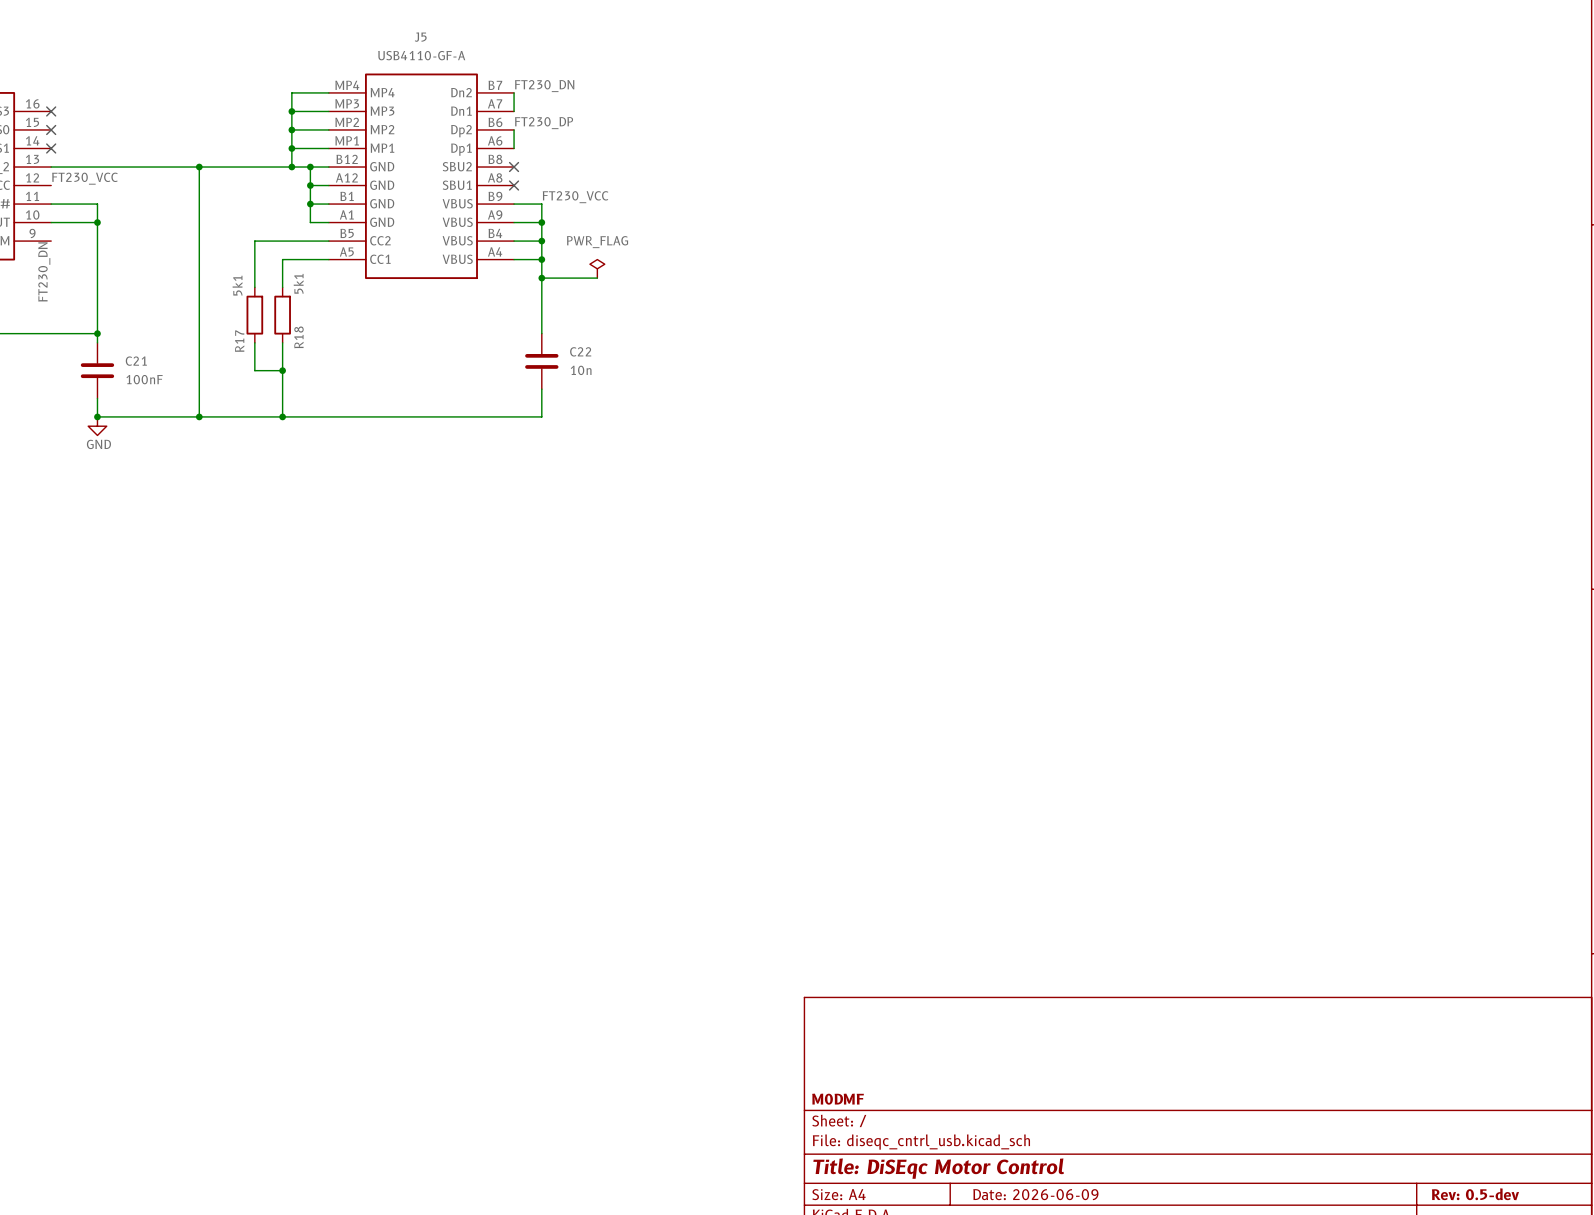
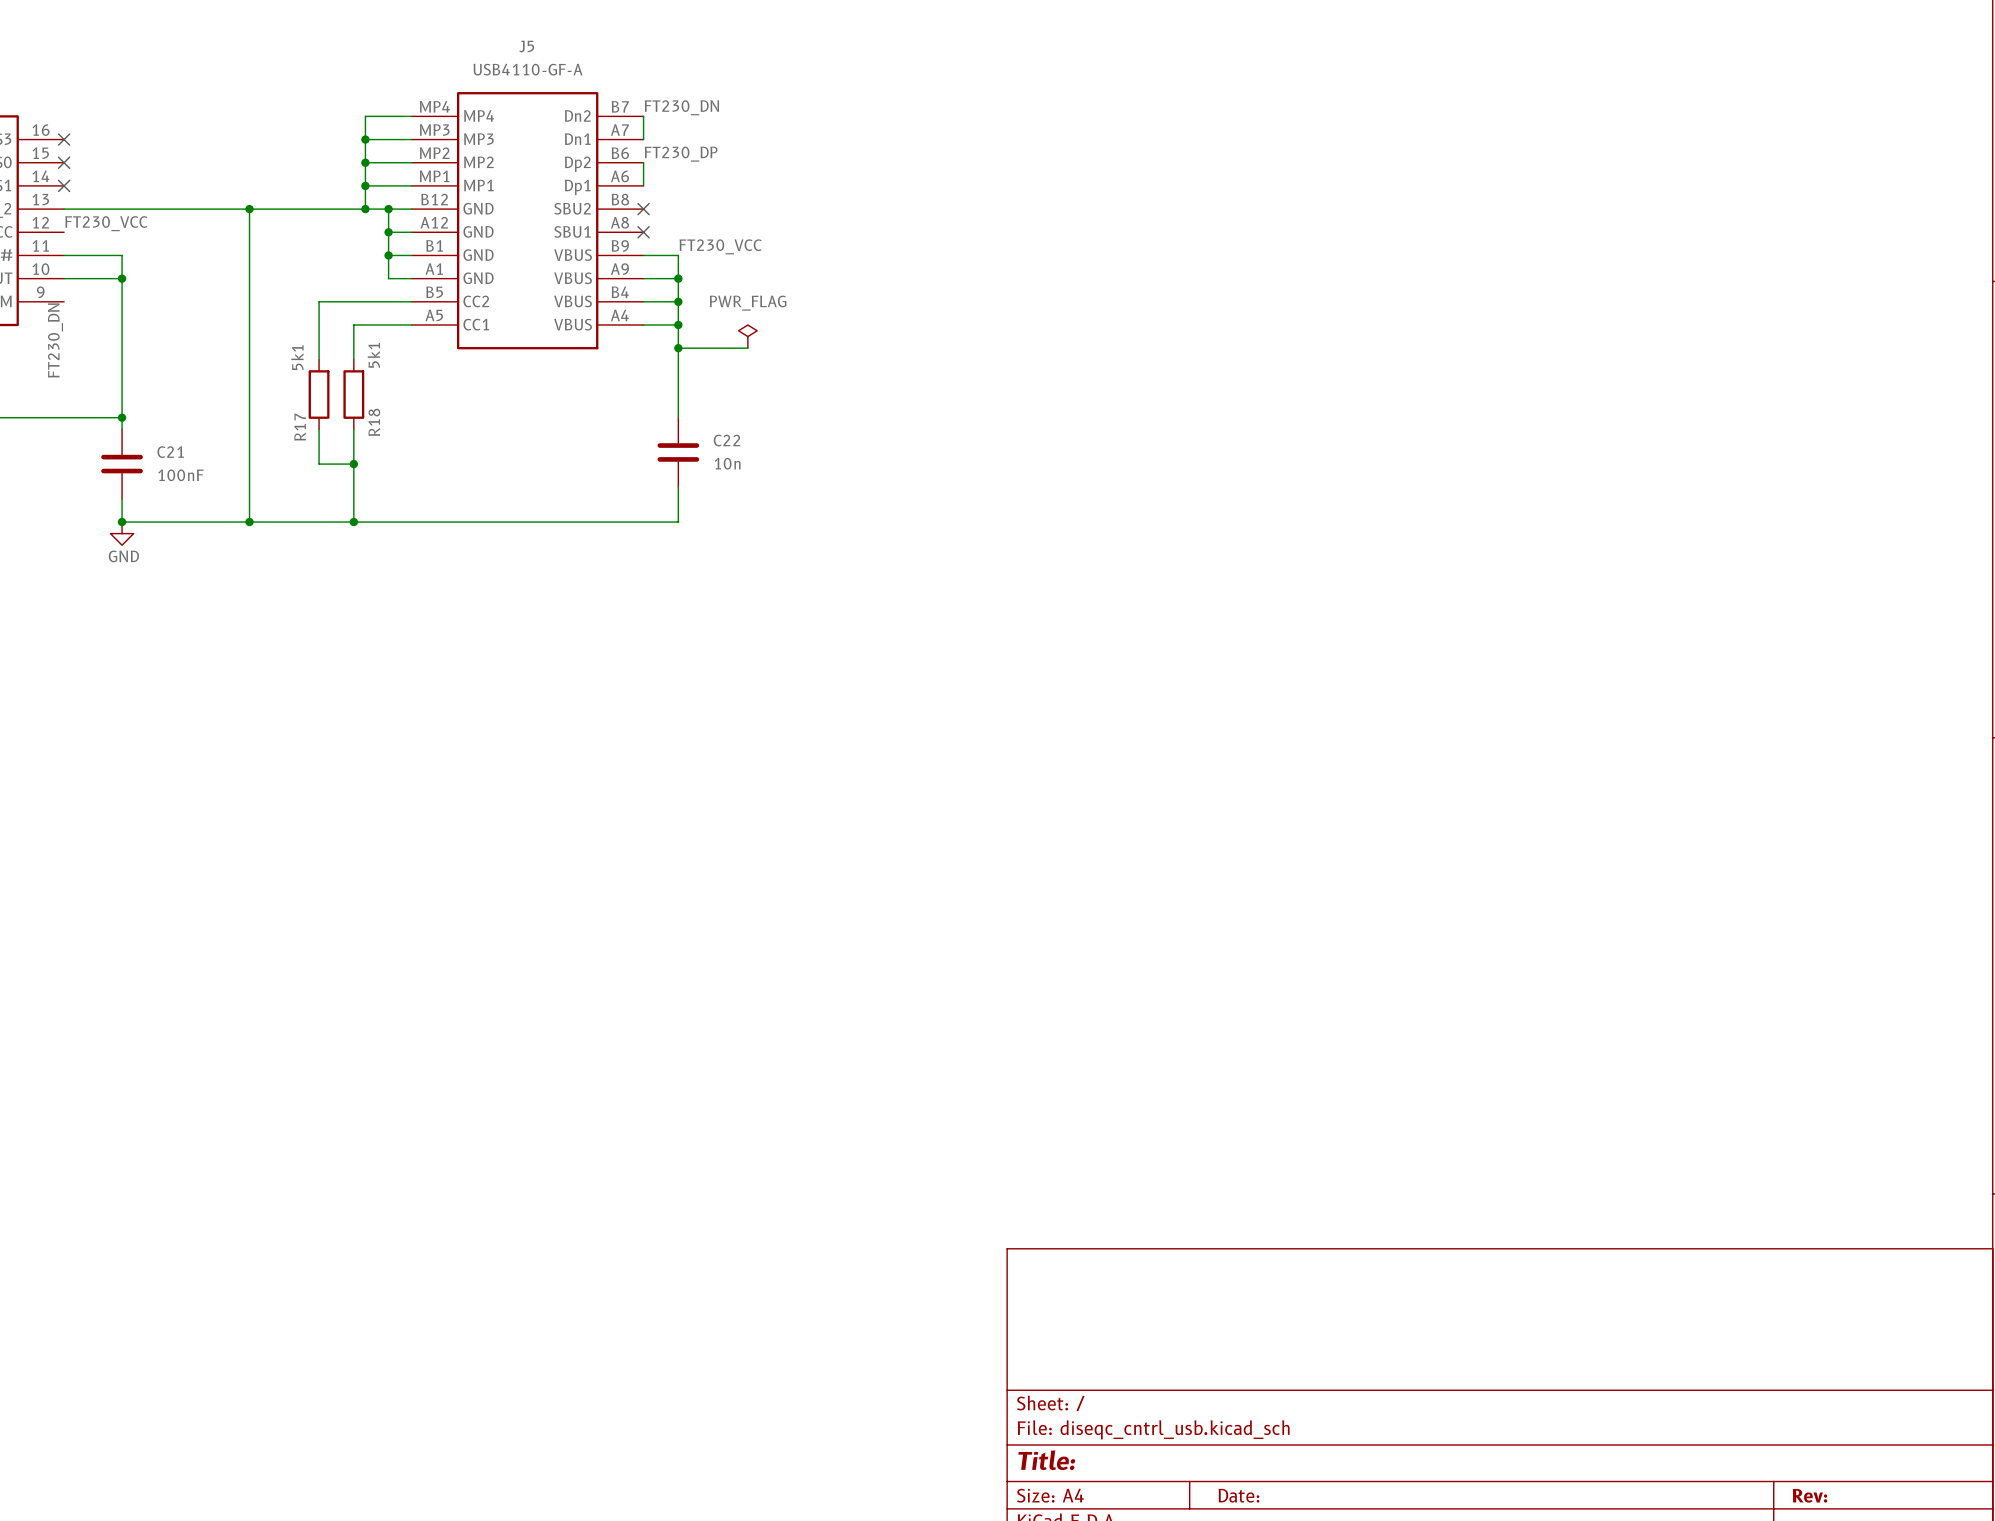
title block: M0DMF (838, 1099) -> none
title block: Title: DiSEqc Motor Control (938, 1168) -> Title: (1046, 1460)
title block: Date: 2026-06-09 (1035, 1194) -> Date: (1238, 1495)
title block: Rev: 0.5-dev (1475, 1194) -> Rev: (1809, 1495)

